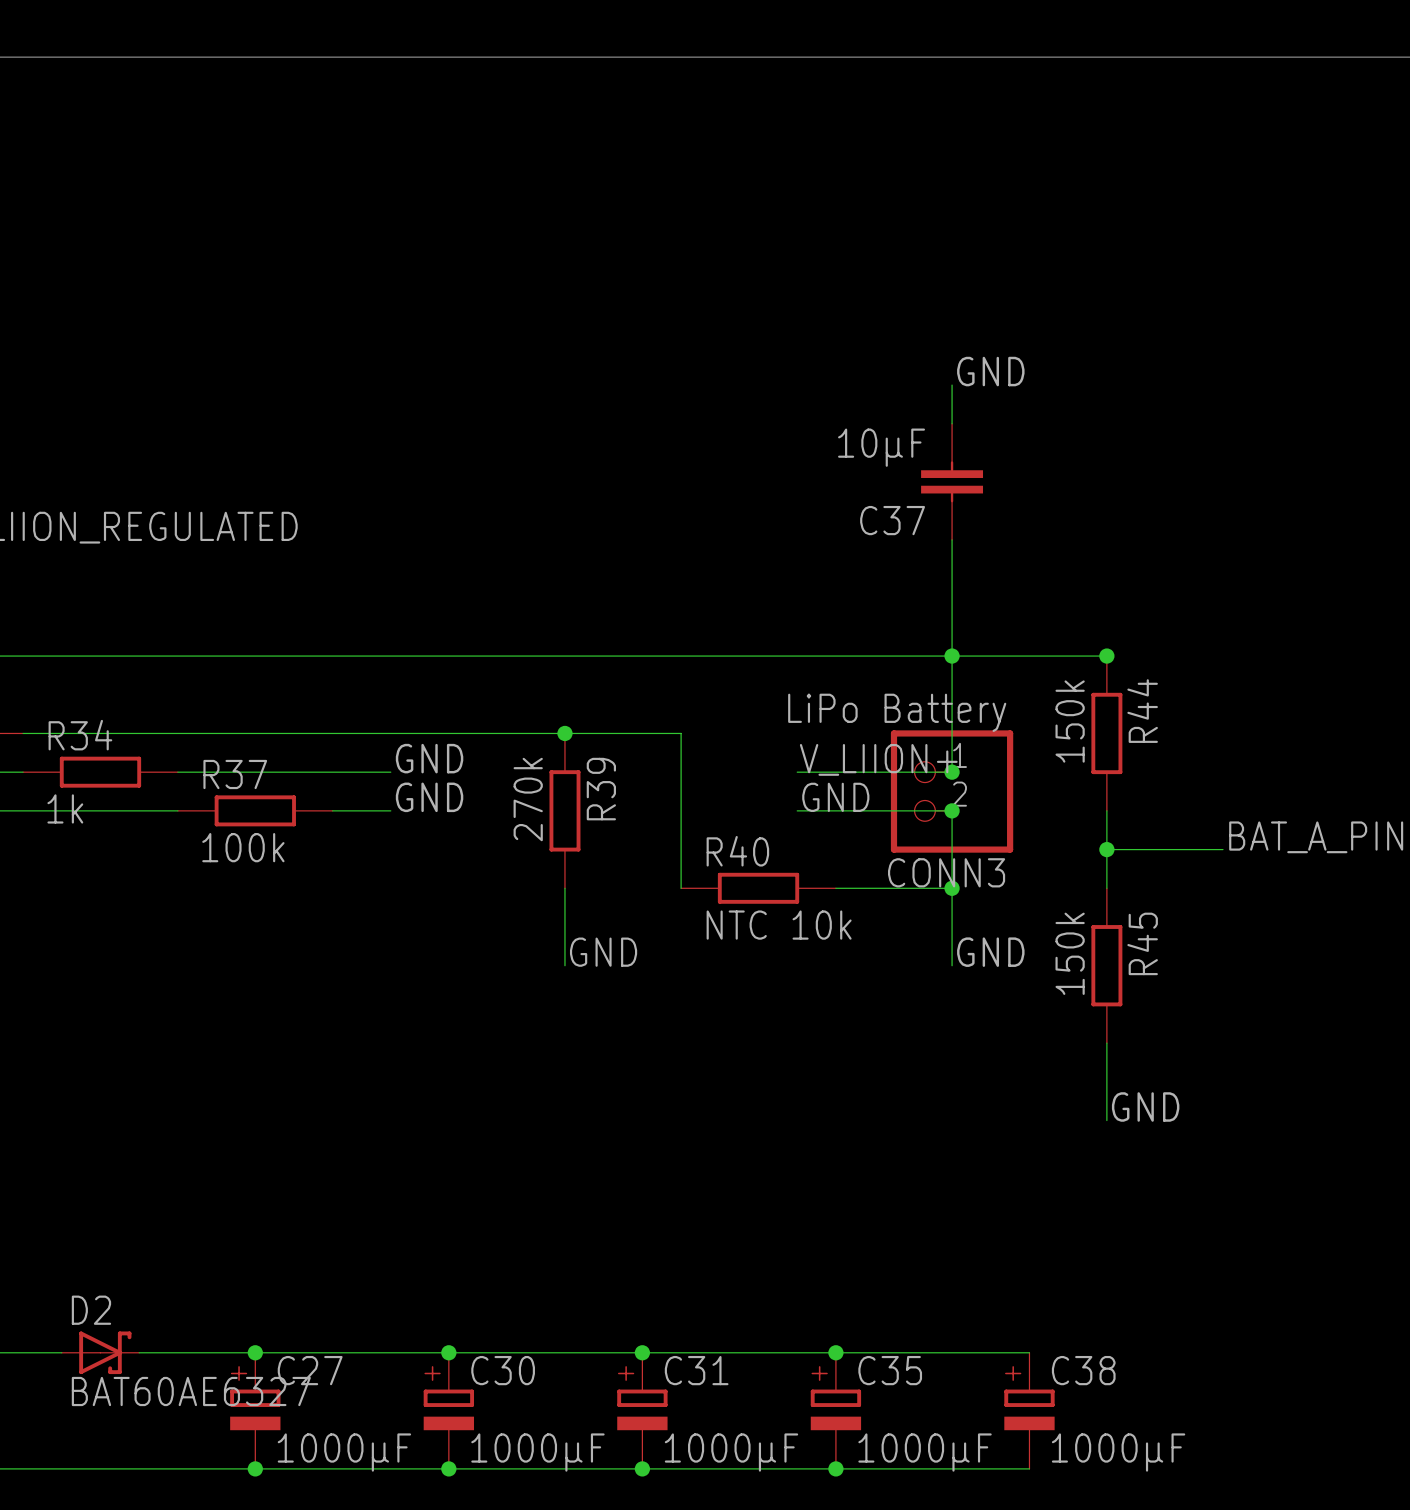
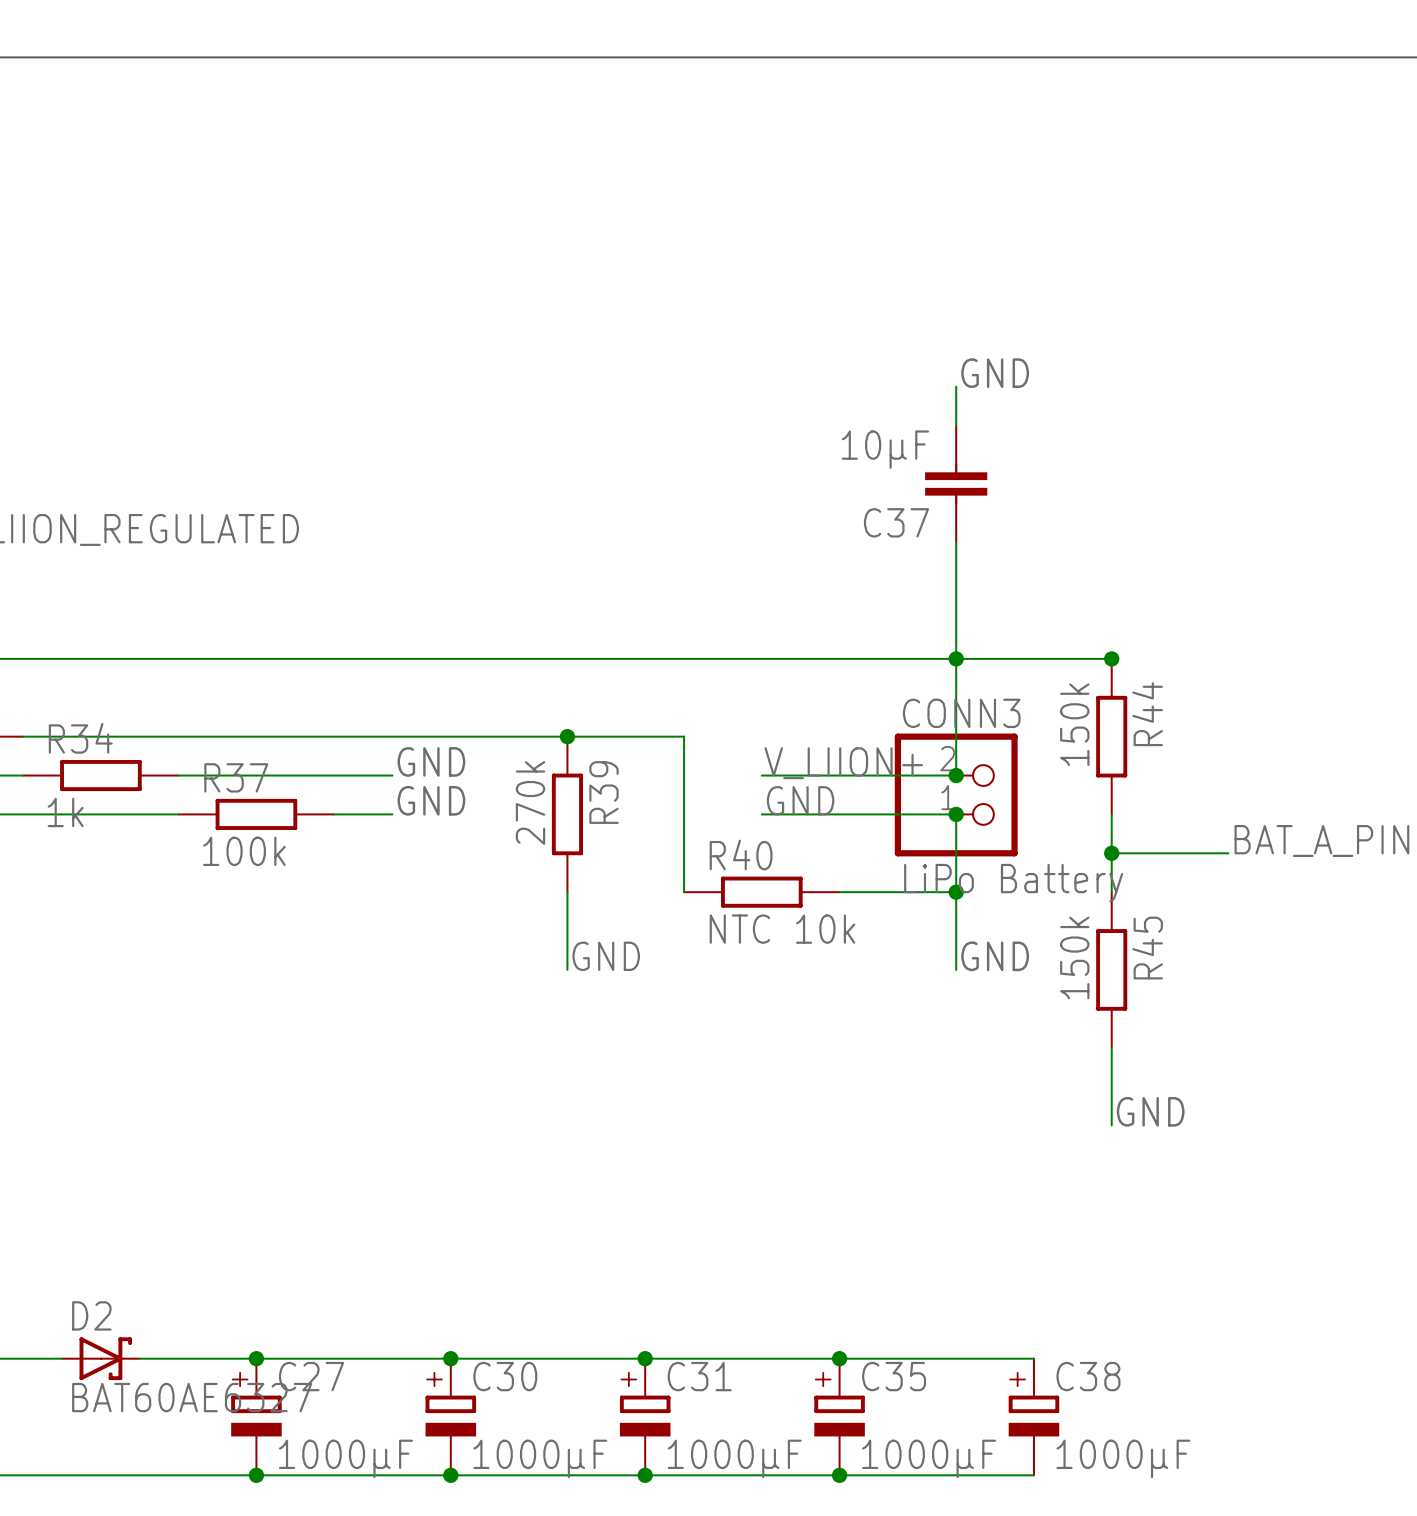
label position: V_LIION+ (878, 759) -> V_LIION+ (843, 763)
wire: none -> (761, 775) (800, 775)
CONN3 rotation: 0° (952, 791) -> 180° (956, 794)
label position: GND (835, 797) -> GND (800, 800)
wire: none -> (761, 814) (800, 814)

